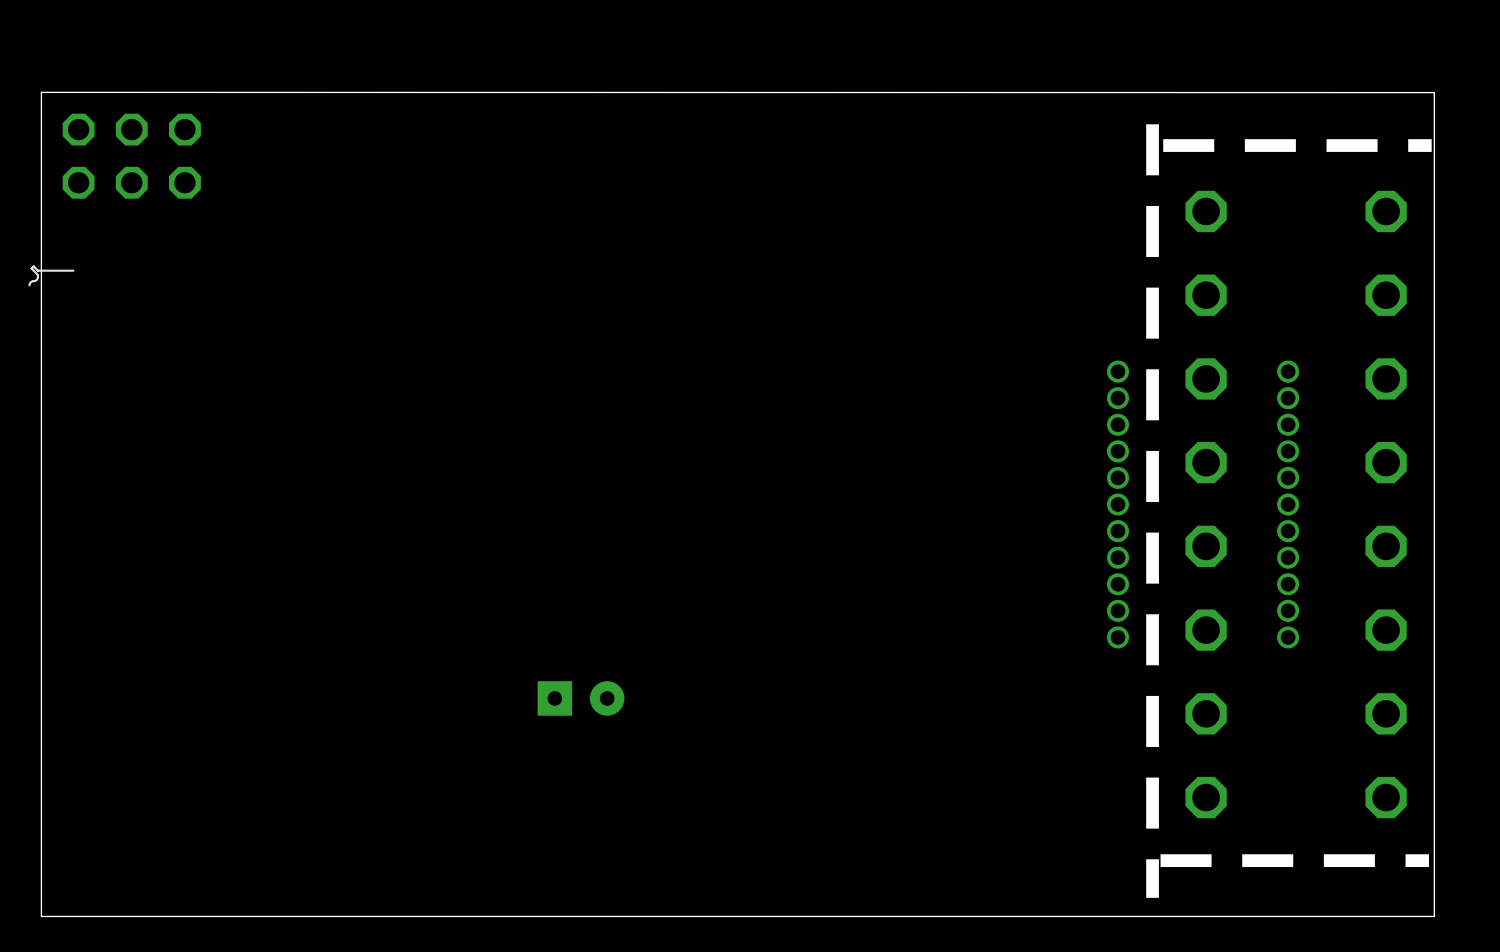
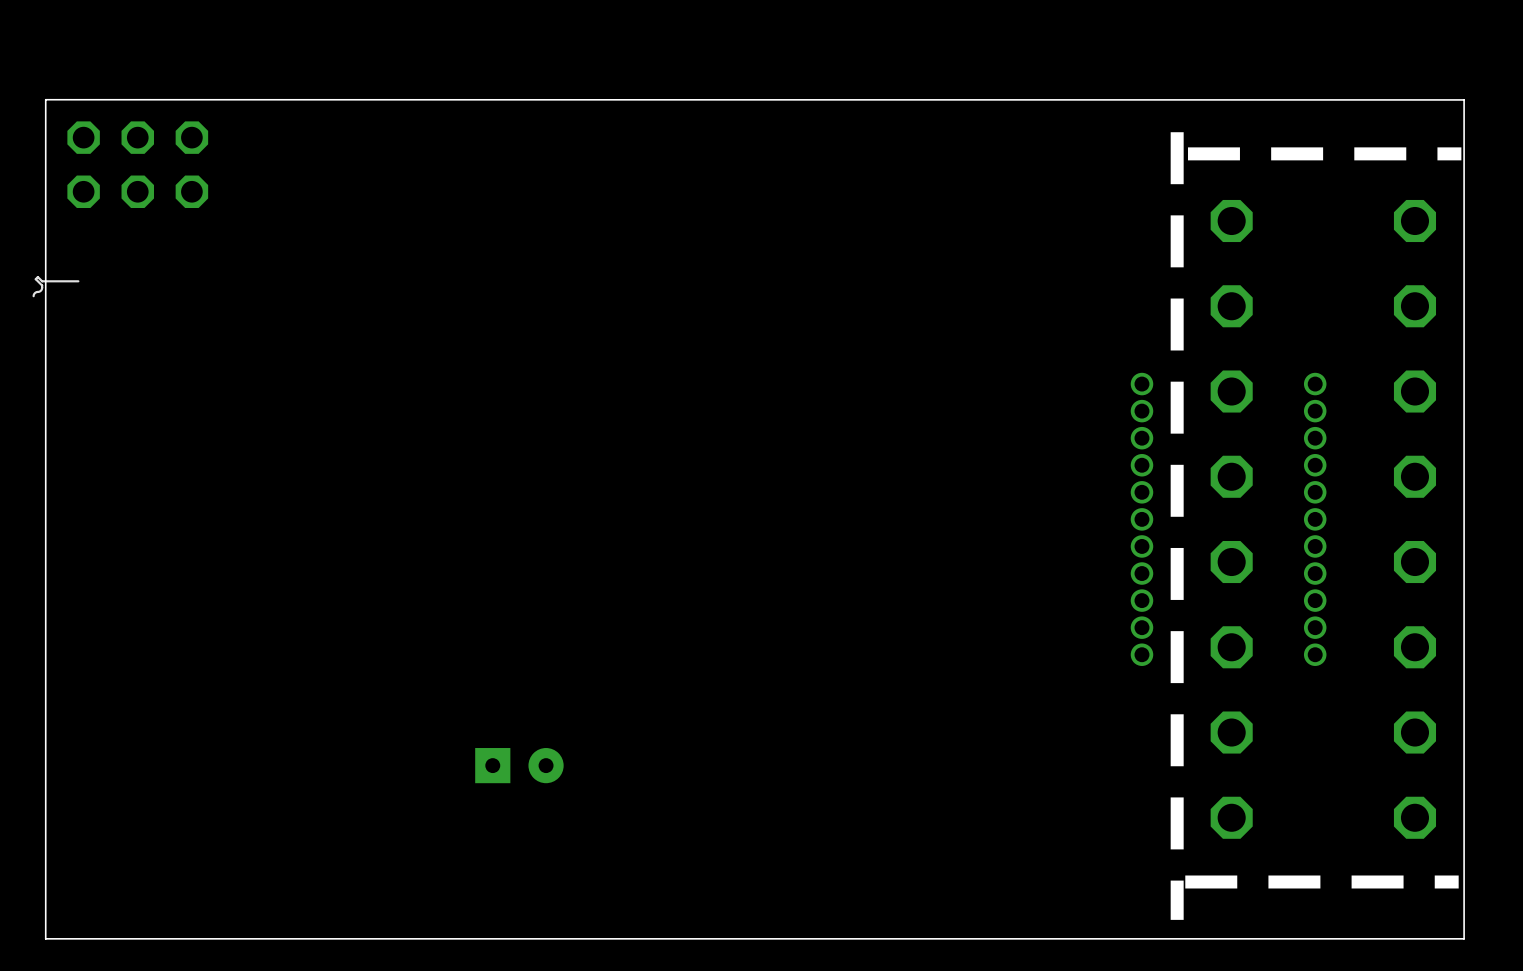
part position: (581, 698) -> (519, 765)

